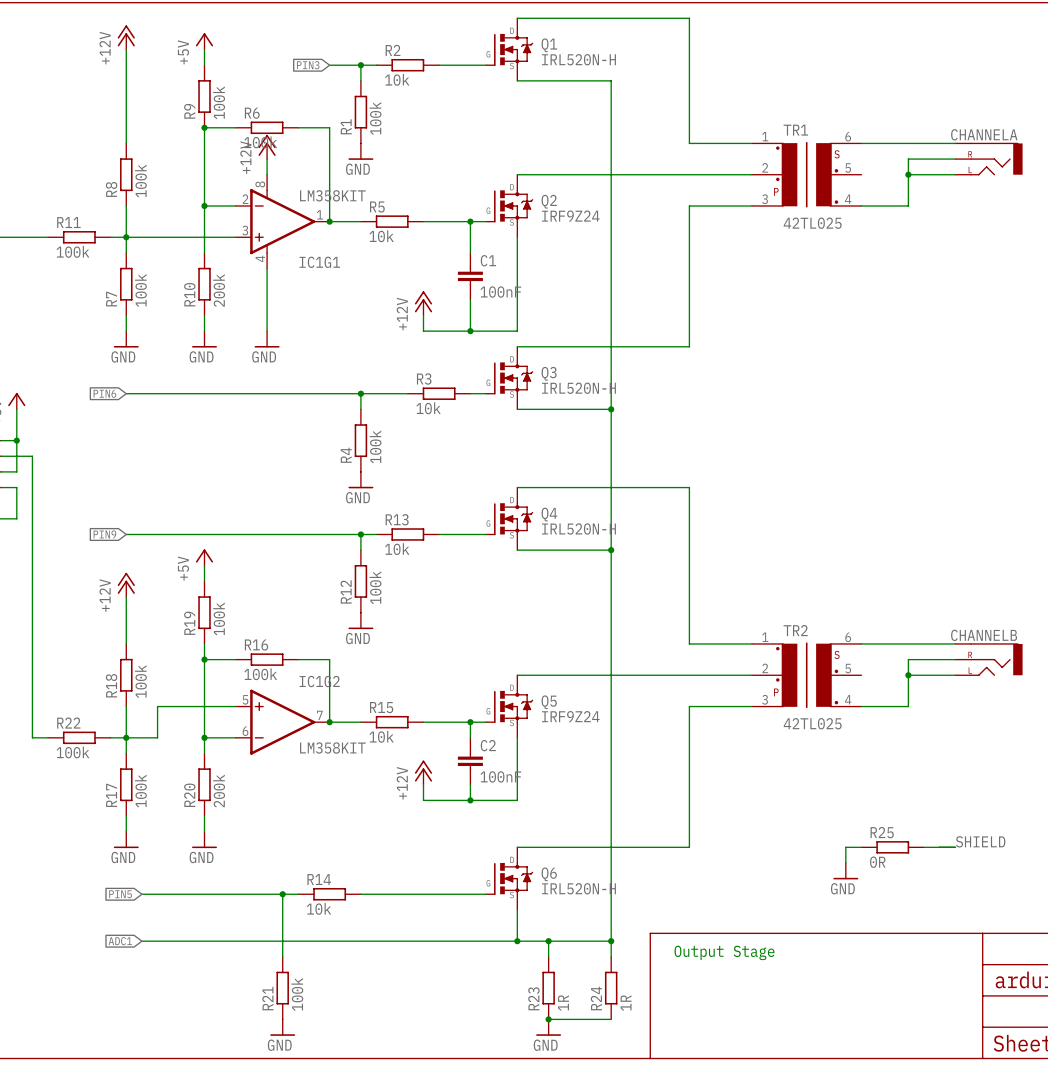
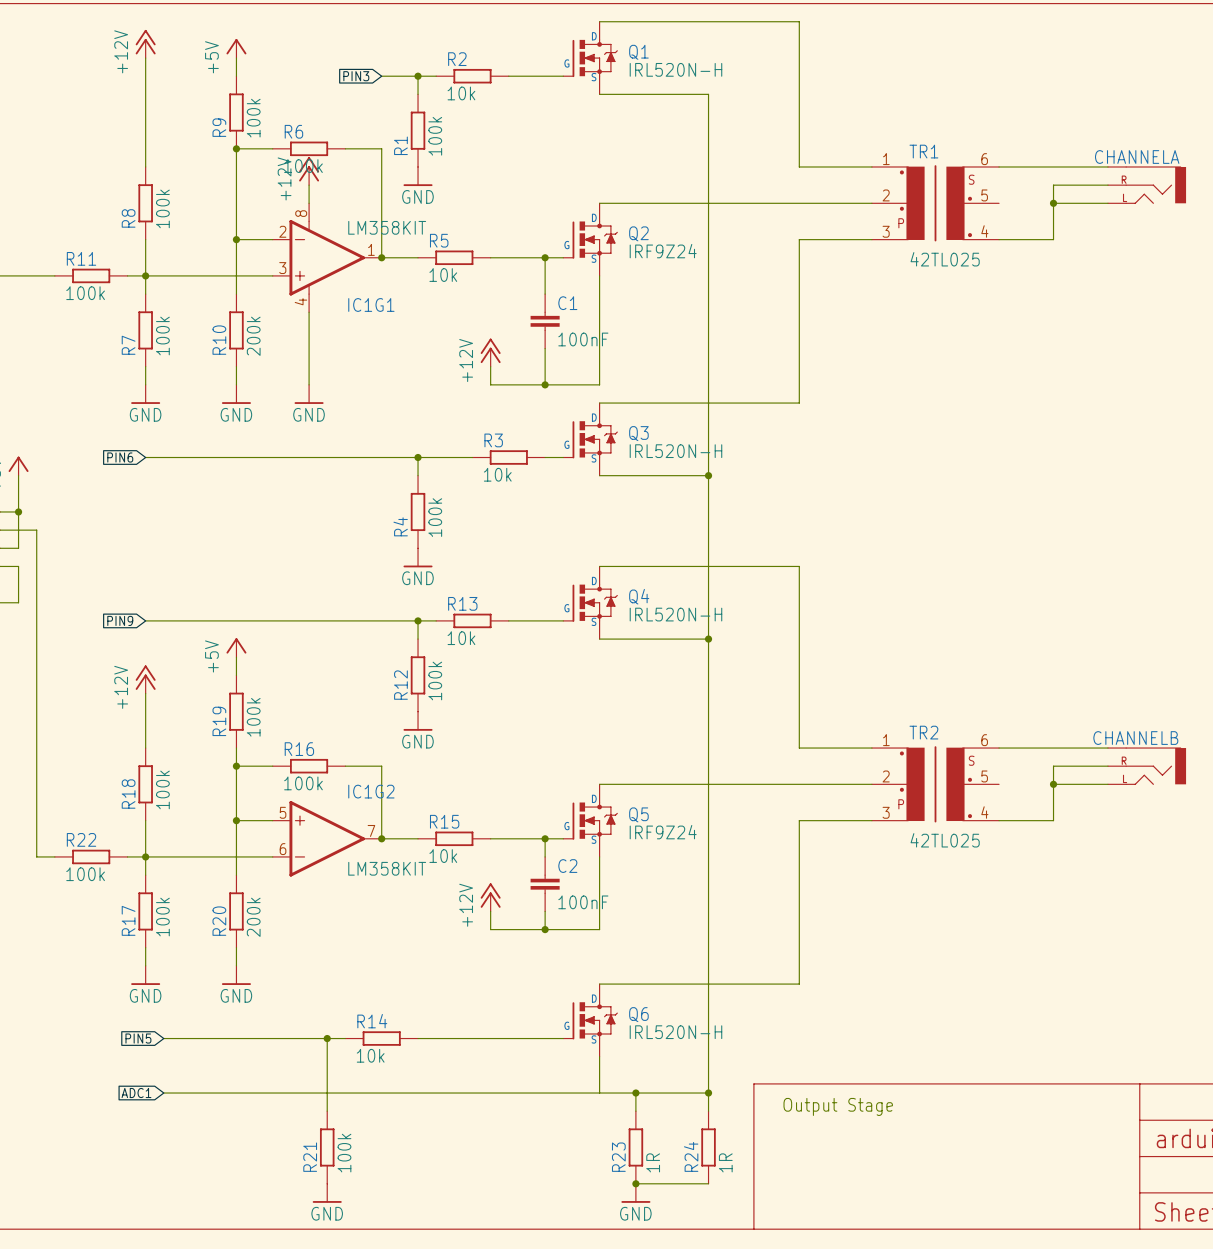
wire: (204, 706) (157, 706) (157, 737) -> (236, 856) (181, 856)
junction position: (204, 737) -> (236, 820)
label: SHIELD (980, 841) -> none
wire: (861, 847) (845, 847) (845, 862) -> none
R25: 0R (892, 847) -> none
wire: (924, 847) (955, 847) -> none
power symbol: GND (845, 871) -> none
junction: (517, 941) -> none

